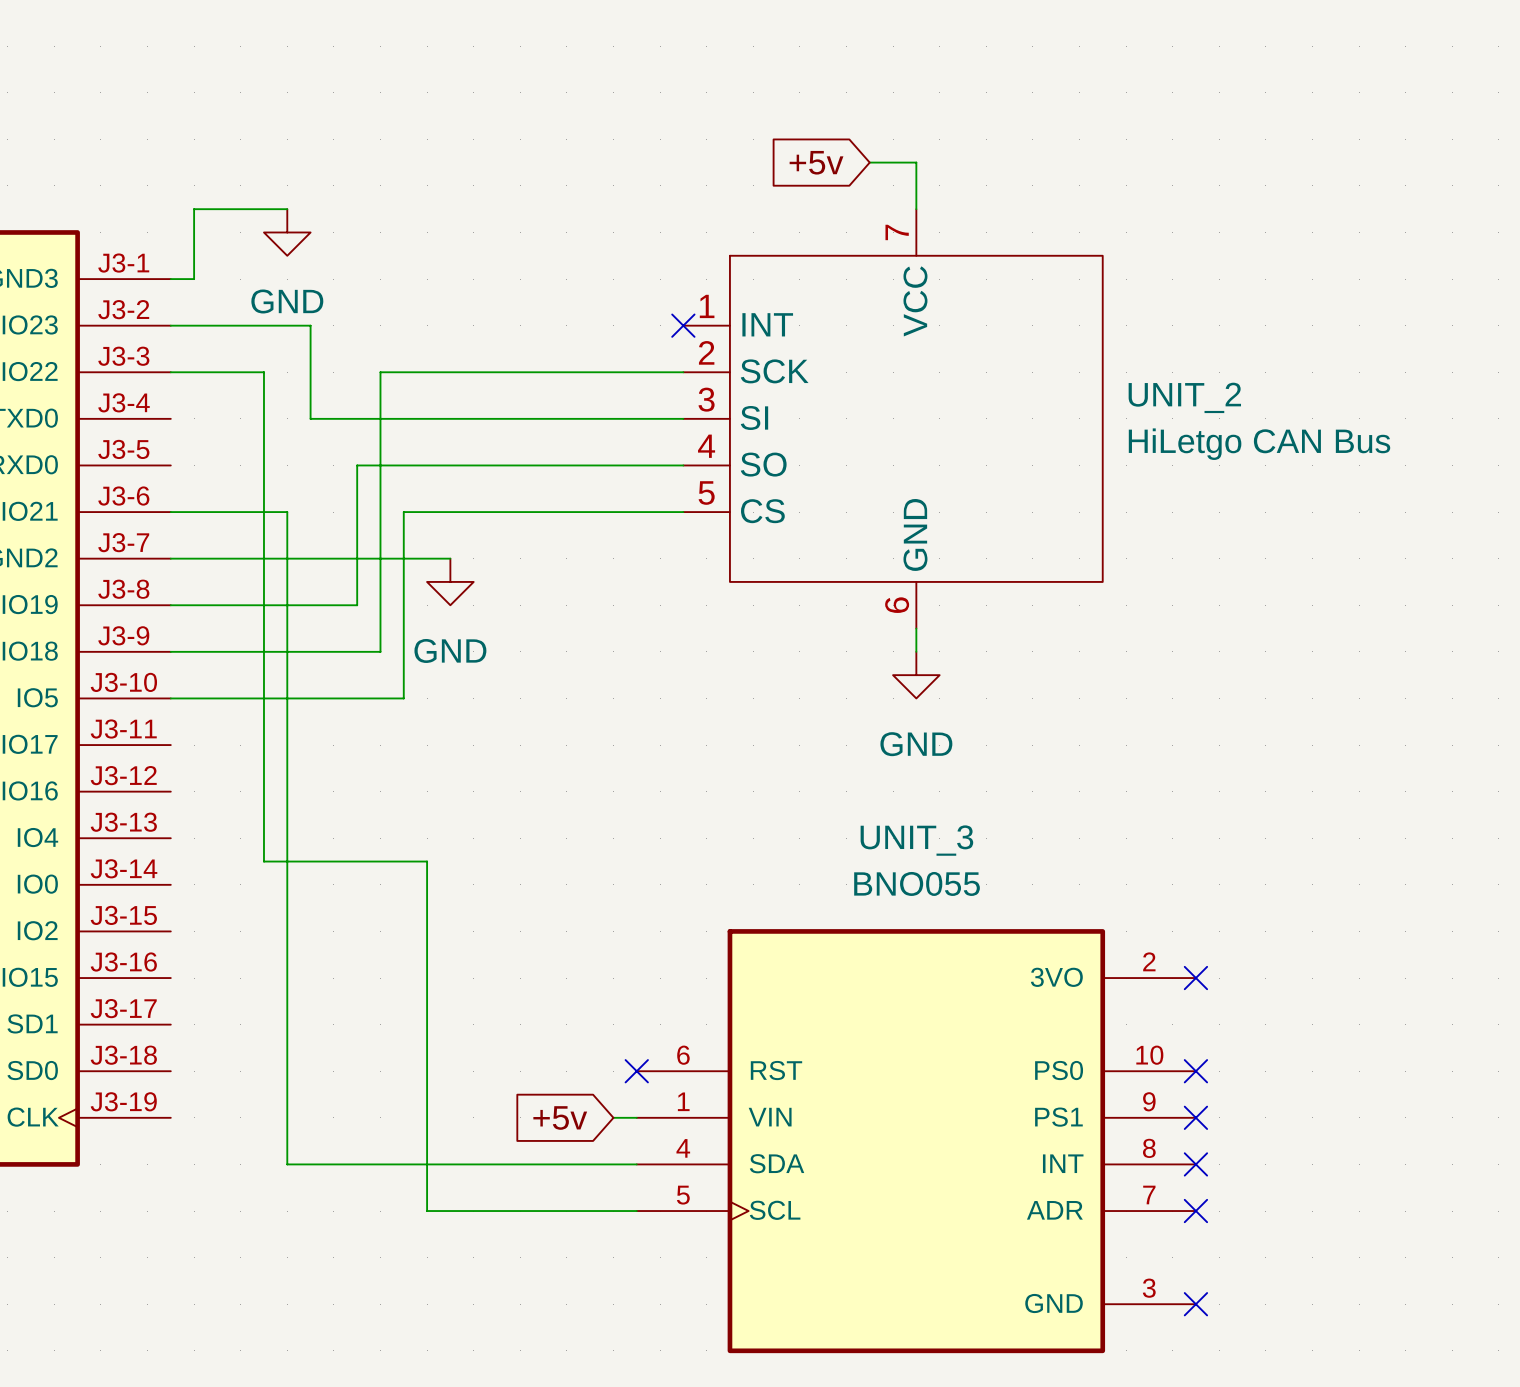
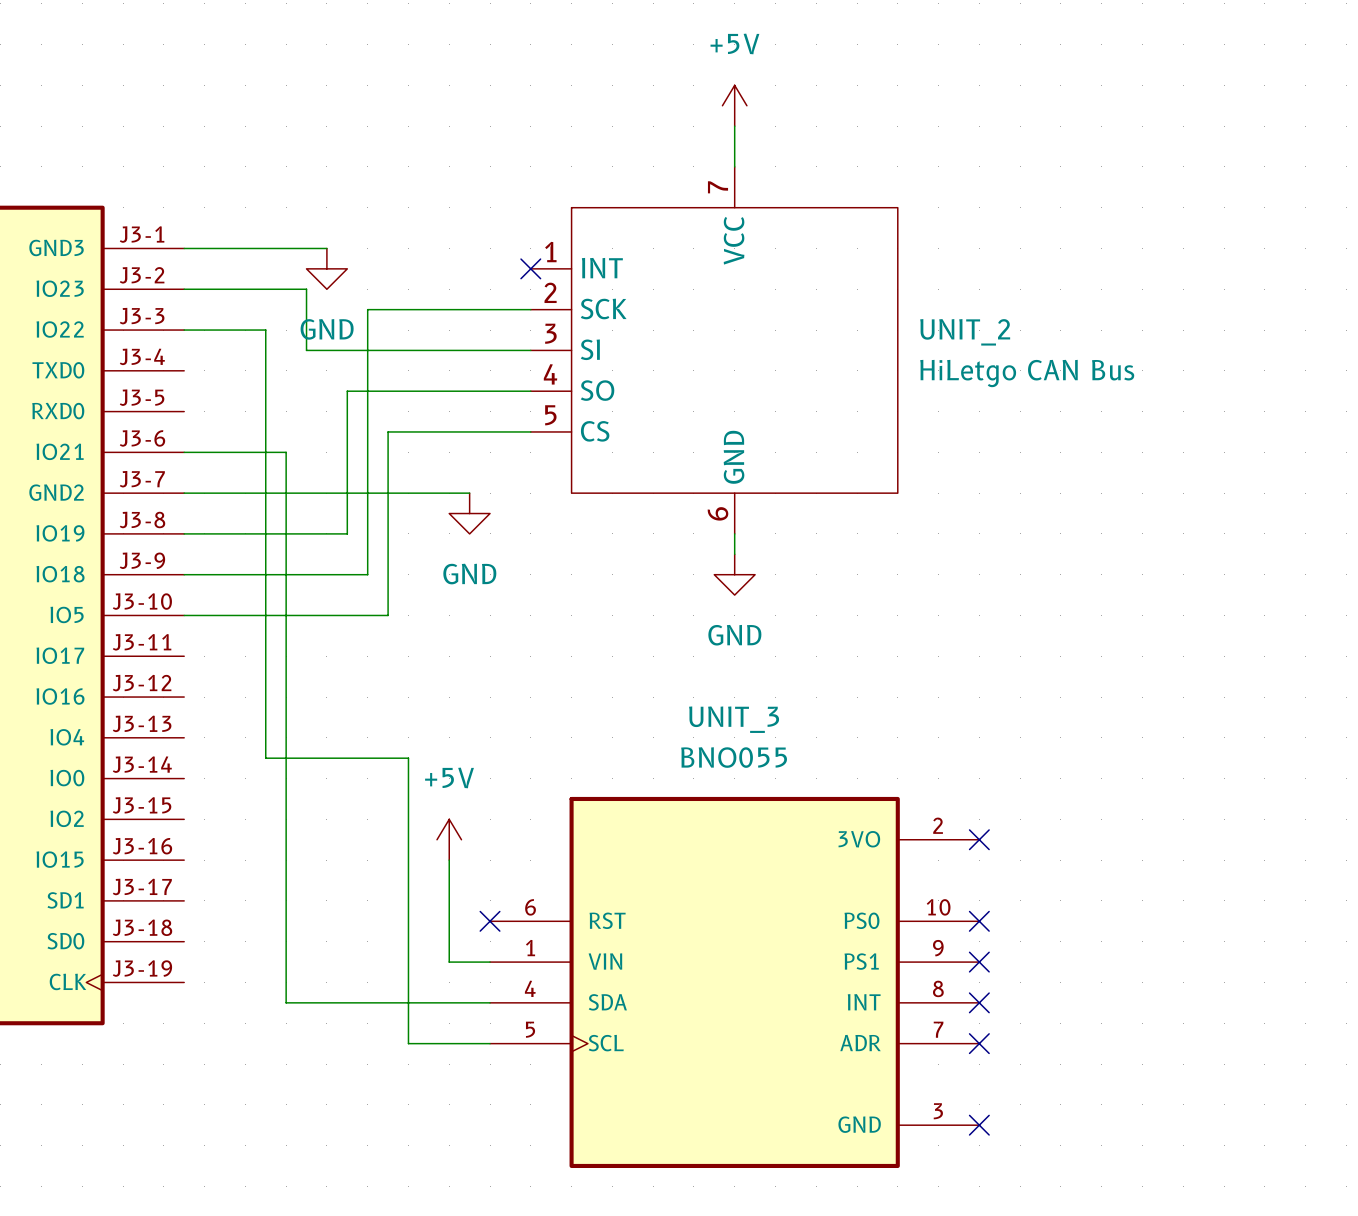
power symbol: none -> +5V (734, 105)
wire: none -> (734, 126) (734, 166)
global label: +5v (816, 162) -> none
wire: (869, 162) (916, 162) (916, 209) -> none
wire: (287, 209) (194, 209) (194, 279) -> (326, 248) (204, 248)
power symbol position: GND (287, 232) -> GND (326, 268)
no-connect mark: none -> (530, 268)
no-connect mark: (683, 325) -> none
wire: (380, 372) (683, 372) -> (367, 330) (367, 309) (530, 309)
wire: (310, 395) (310, 418) (683, 418) -> (306, 350) (530, 350)
UNIT_2 position: (893, 418) -> (714, 350)
wire: (357, 465) (683, 465) -> (347, 411) (347, 391) (530, 391)
wire: (403, 512) (683, 512) -> (388, 452) (388, 431) (530, 431)
wire: none -> (428, 493) (469, 493)
power symbol position: GND (450, 581) -> GND (469, 513)
wire: (916, 628) (916, 651) -> (734, 533) (734, 554)
power symbol position: GND (916, 675) -> GND (734, 574)
power symbol: none -> +5V (449, 839)
no-connect mark: none -> (979, 839)
wire: none -> (449, 860) (449, 962) (490, 962)
no-connect mark: (1195, 978) -> none
no-connect mark: none -> (490, 921)
no-connect mark: none -> (979, 921)
no-connect mark: (636, 1071) -> none
no-connect mark: (1195, 1071) -> none
no-connect mark: none -> (979, 962)
global label: +5v (560, 1117) -> none
no-connect mark: (1195, 1117) -> none
wire: (287, 1141) (287, 1164) (636, 1164) -> (286, 1002) (490, 1002)
UNIT_3 position: (916, 1141) -> (734, 982)
no-connect mark: none -> (979, 1002)
no-connect mark: (1195, 1164) -> none
wire: (427, 1187) (427, 1211) (636, 1211) -> (408, 1043) (490, 1043)
no-connect mark: none -> (979, 1043)
no-connect mark: (1195, 1211) -> none
no-connect mark: none -> (979, 1125)
no-connect mark: (1195, 1304) -> none

